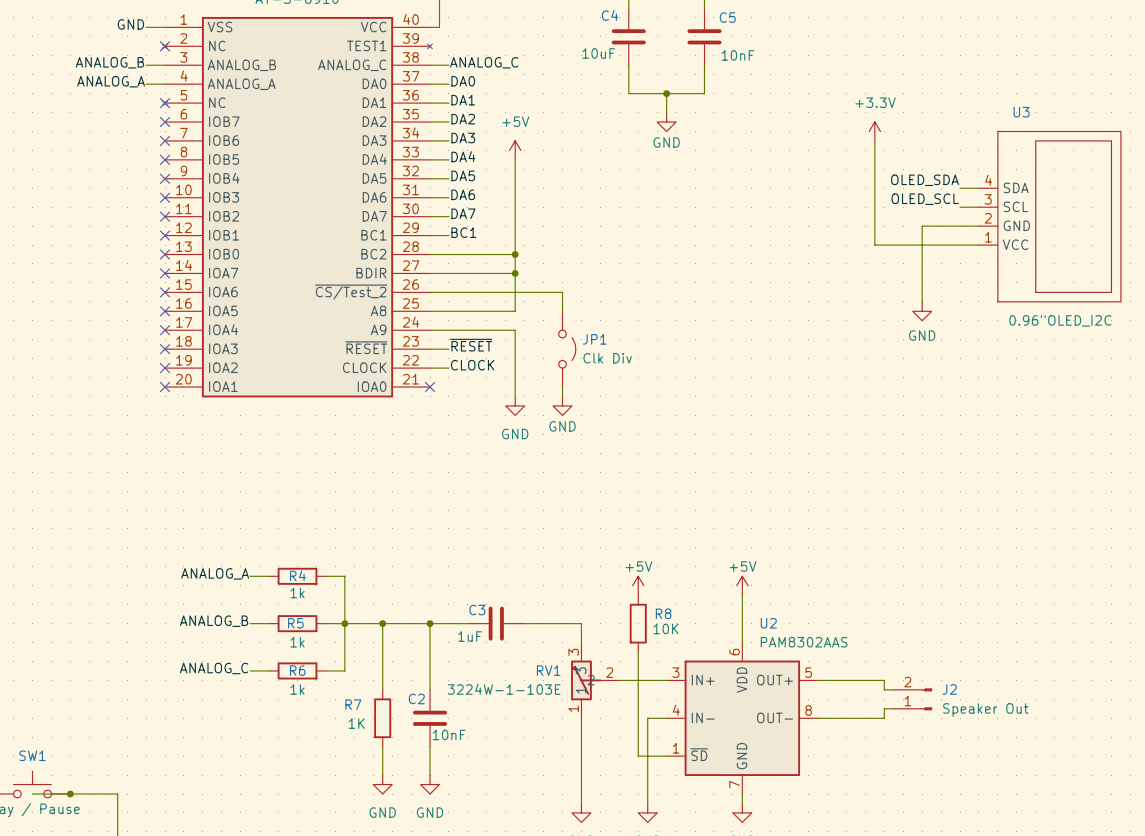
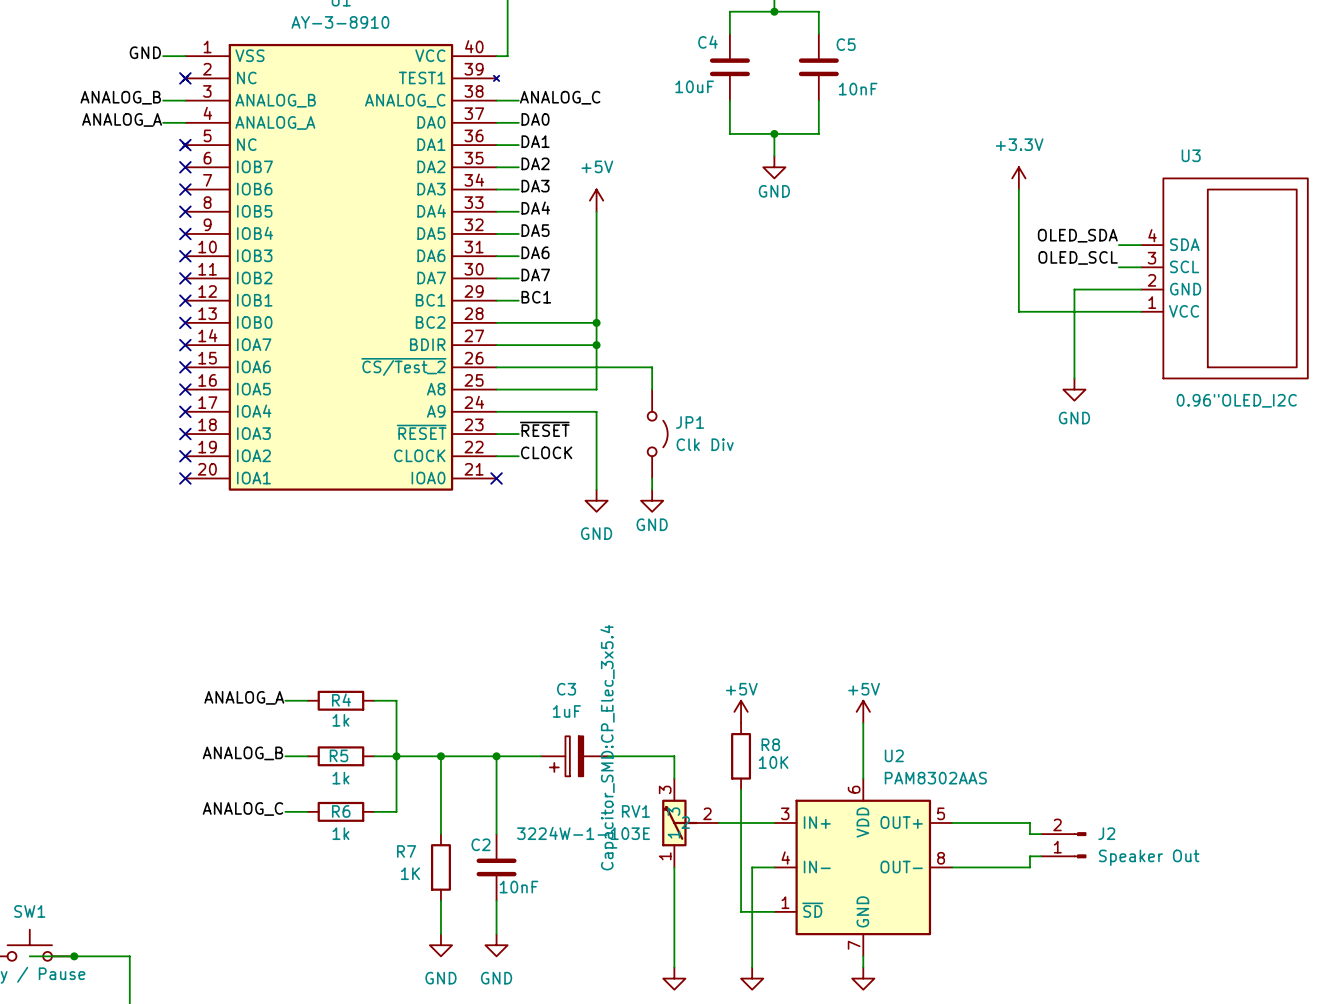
C3 symbol: [467, 606, 525, 641] -> [541, 736, 608, 777]
C3 name position: C3 (477, 610) -> C3 (566, 689)
C3 text: none -> Capacitor_SMD:CP_Elec_3x5.4 (608, 747)
C3 value position: 1uF (470, 636) -> 1uF (566, 711)

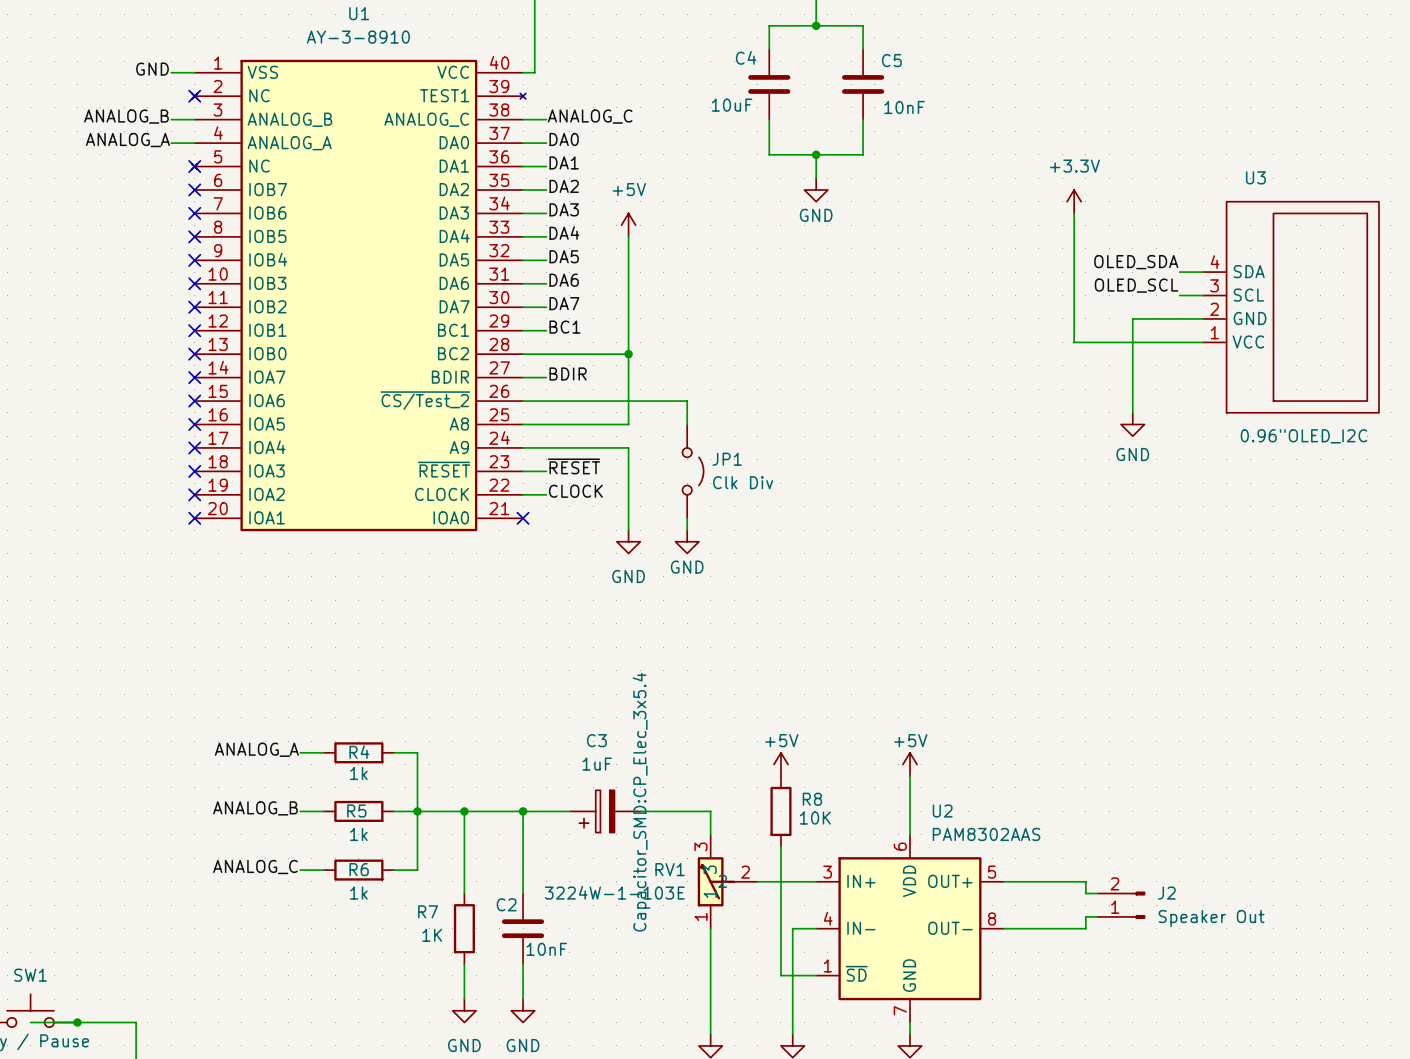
label: none -> BDIR (568, 373)
wire: (518, 345) (596, 345) -> none
junction: (596, 345) -> none

